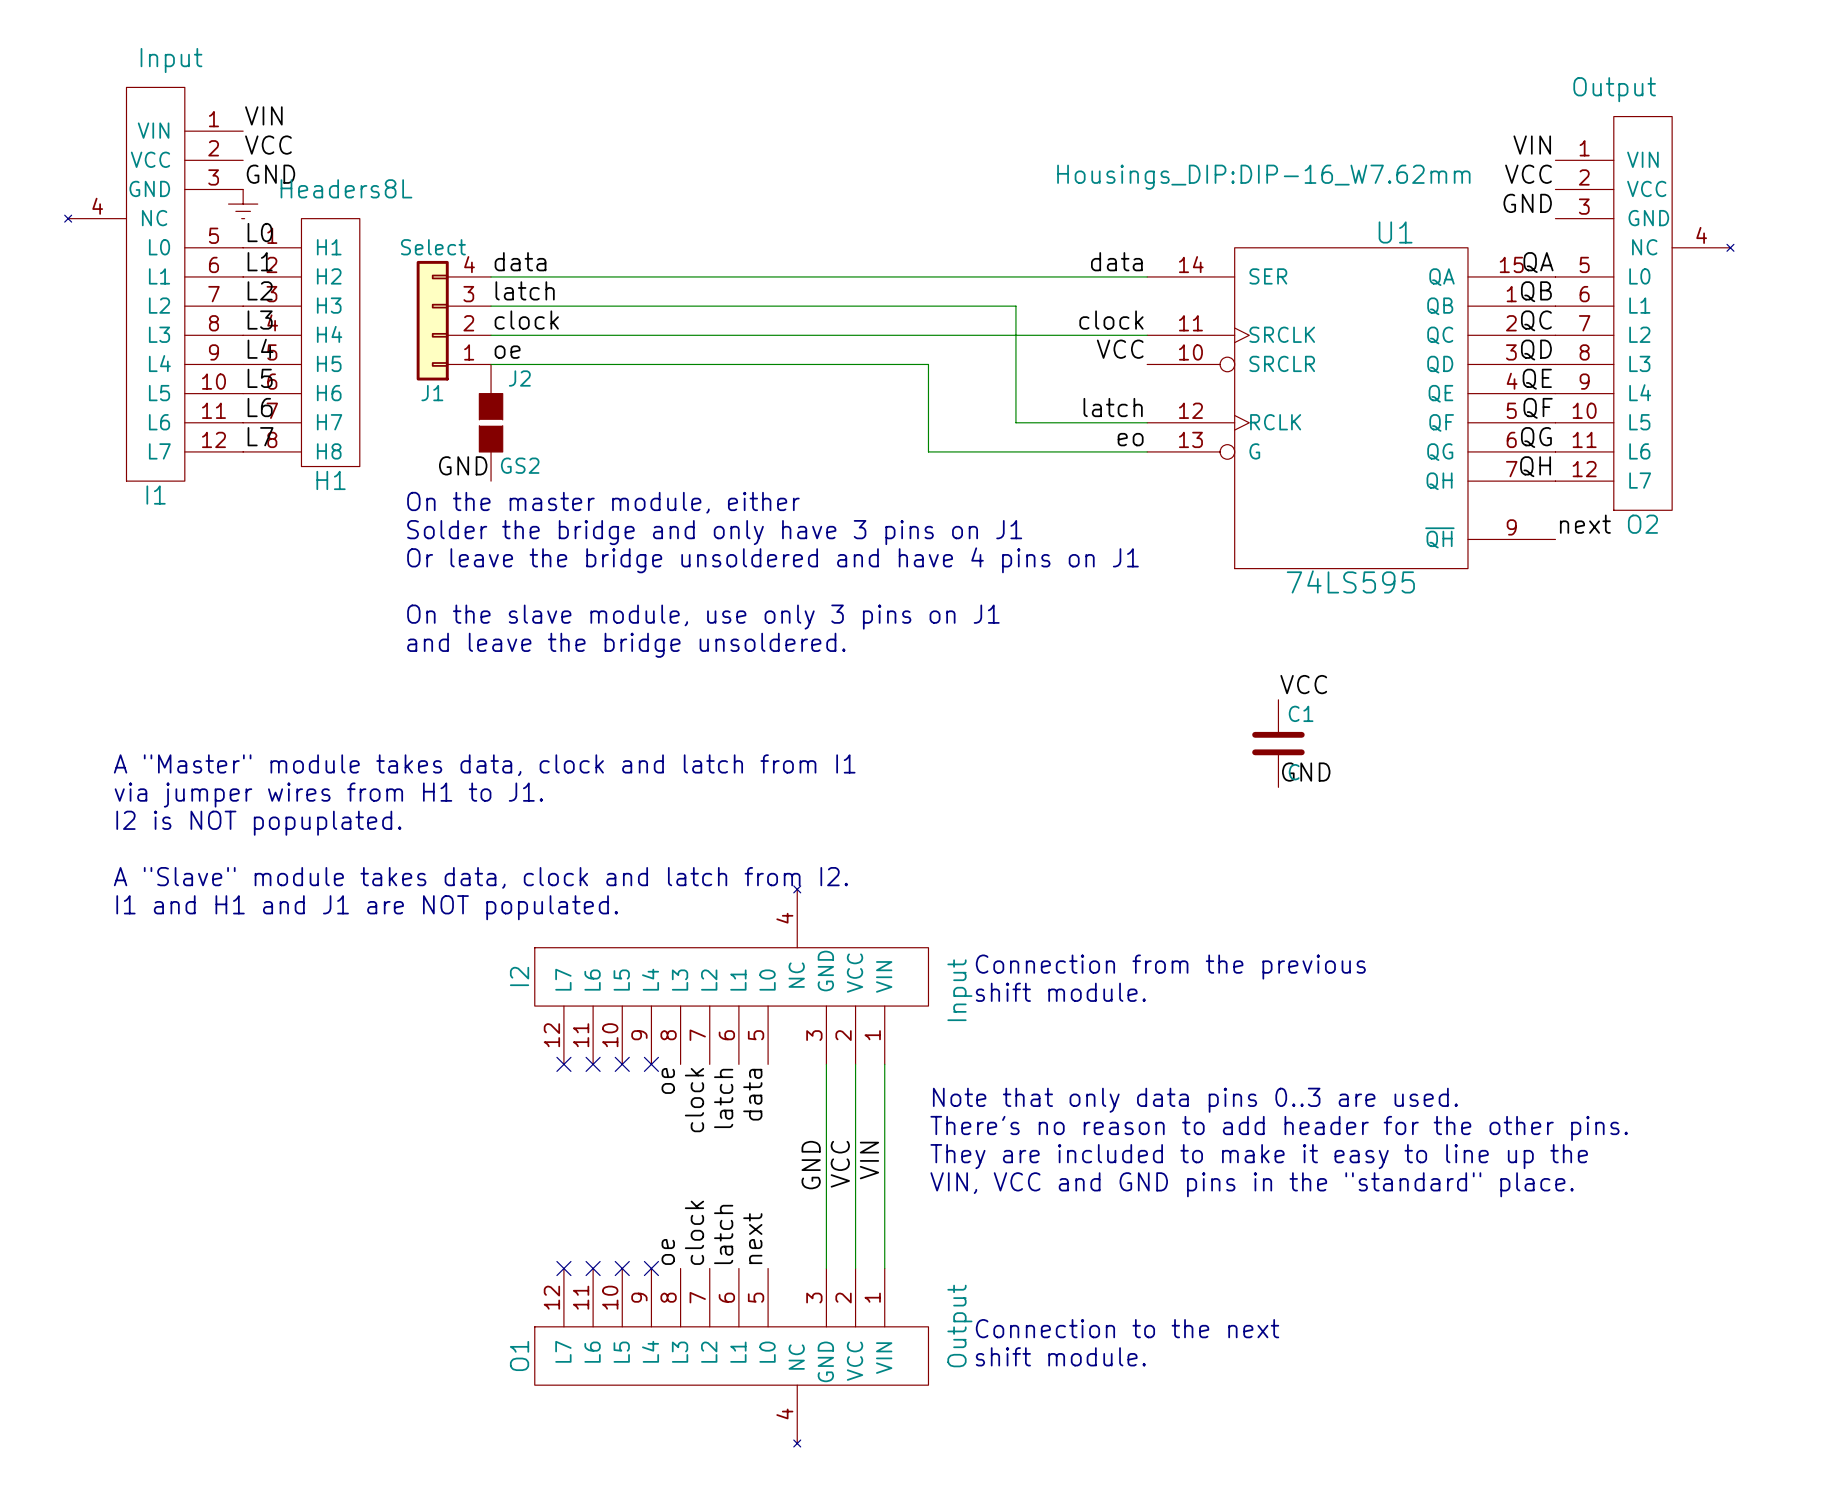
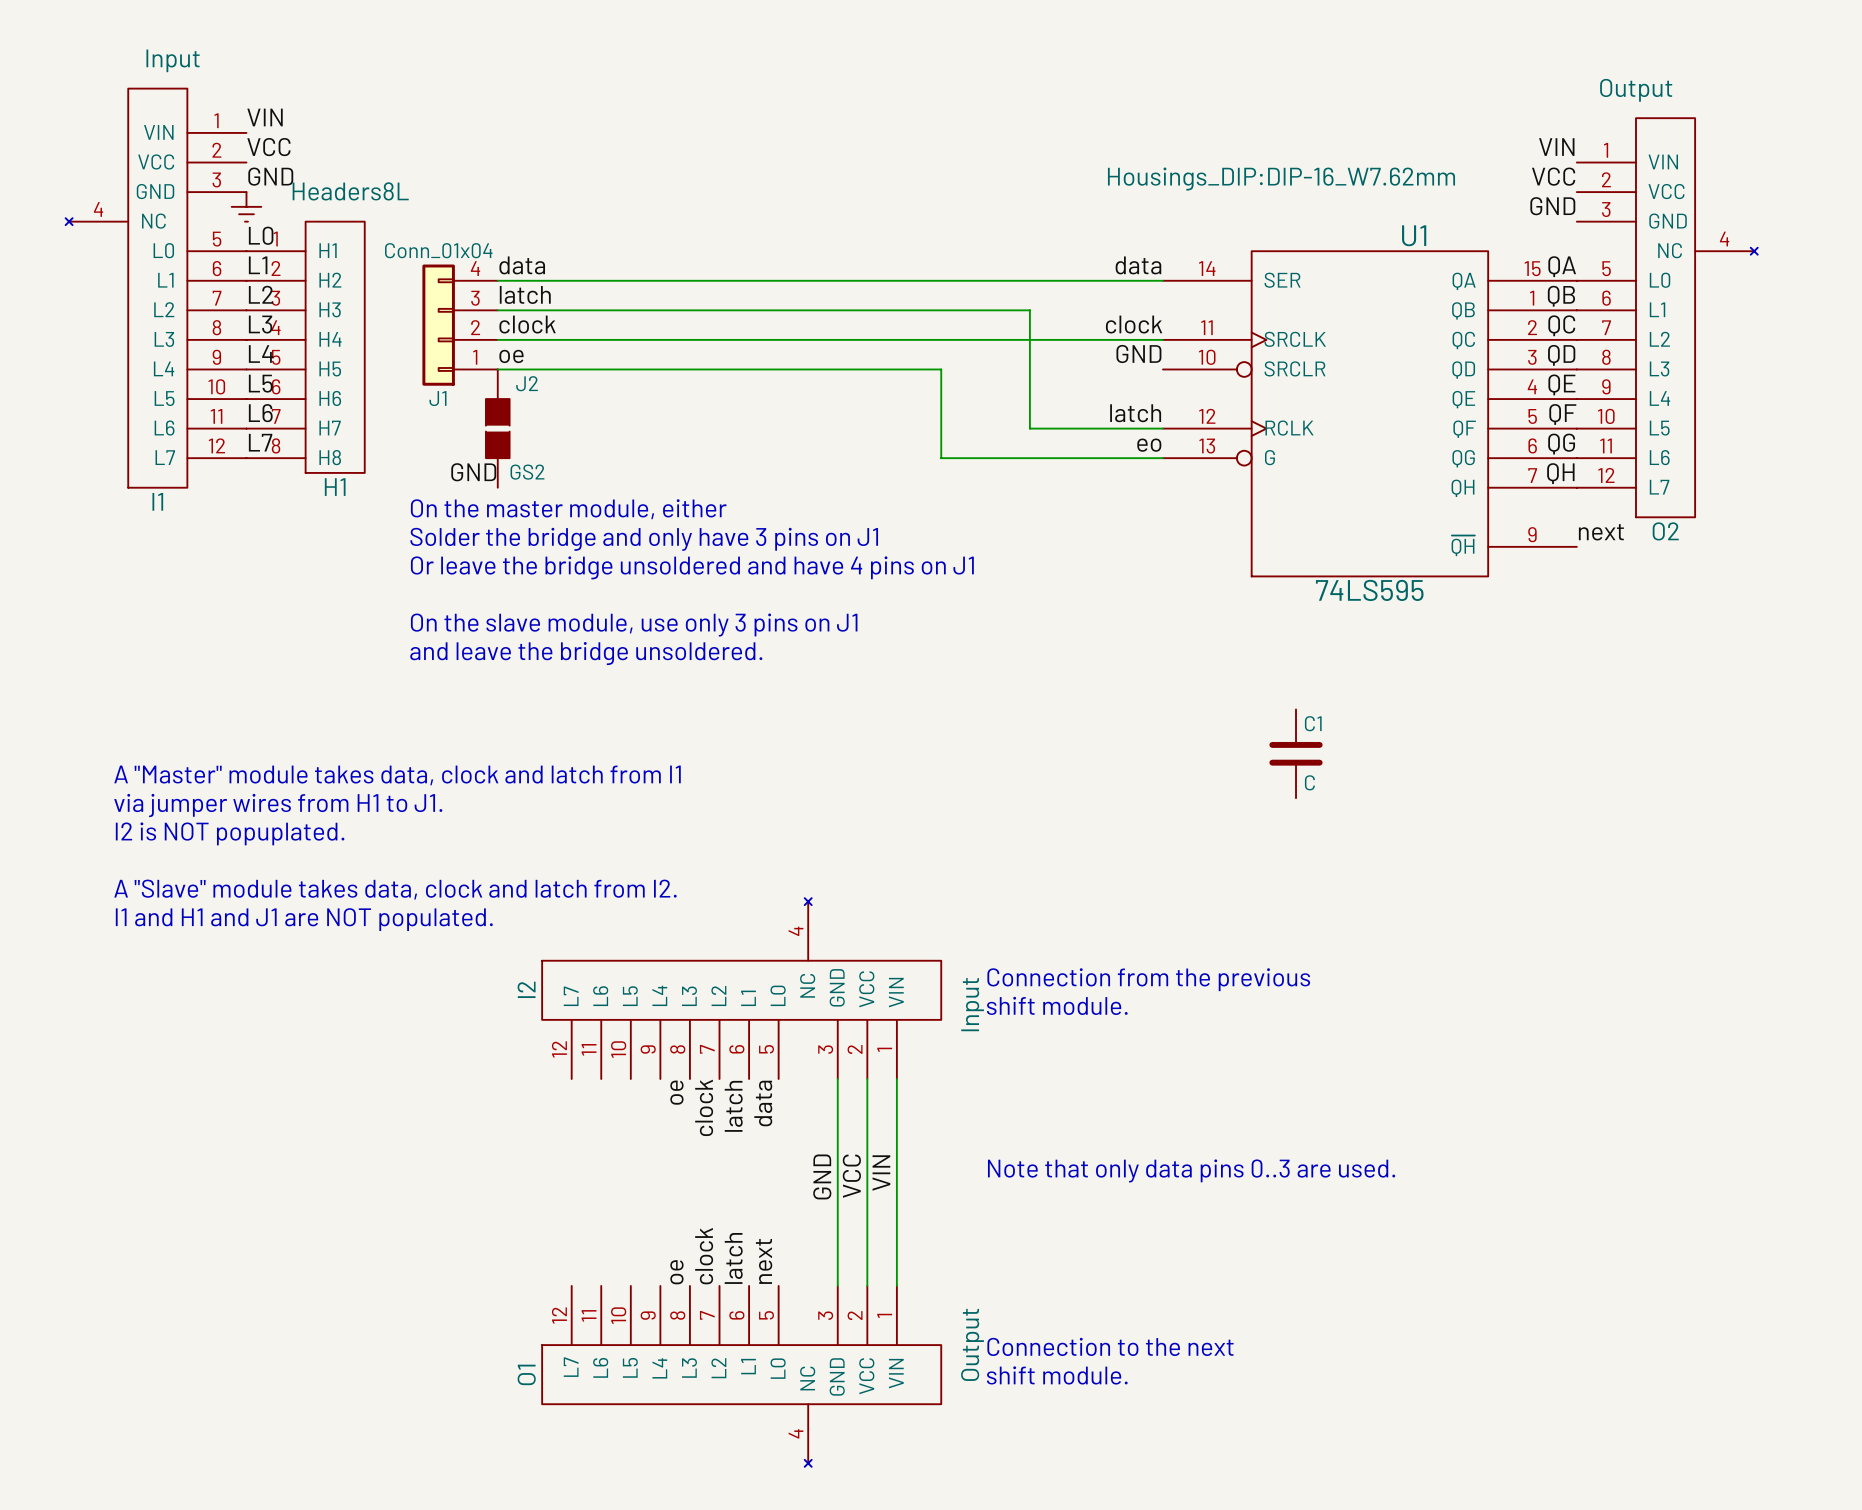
J1 value: Select (433, 247) -> Conn_01x04 (438, 250)
label: VCC (1120, 349) -> GND (1138, 354)
label: VCC (1303, 684) -> none
label: GND (1306, 772) -> none
no-connect mark: (563, 1064) -> none
no-connect mark: (593, 1064) -> none
no-connect mark: (622, 1064) -> none
no-connect mark: (651, 1064) -> none
text position: Note that only data pins 0..3 are used. (1195, 1100) -> Note that only data pins 0..3 are used. (1191, 1170)
text: There's no reason to add header for the other pins. (1279, 1128) -> none
text: They are included to make it easy to line up the (1259, 1156) -> none
text: VIN, VCC and GND pins in the "standard" place. (1252, 1184) -> none
no-connect mark: (563, 1268) -> none
no-connect mark: (593, 1268) -> none
no-connect mark: (622, 1268) -> none
no-connect mark: (651, 1268) -> none

